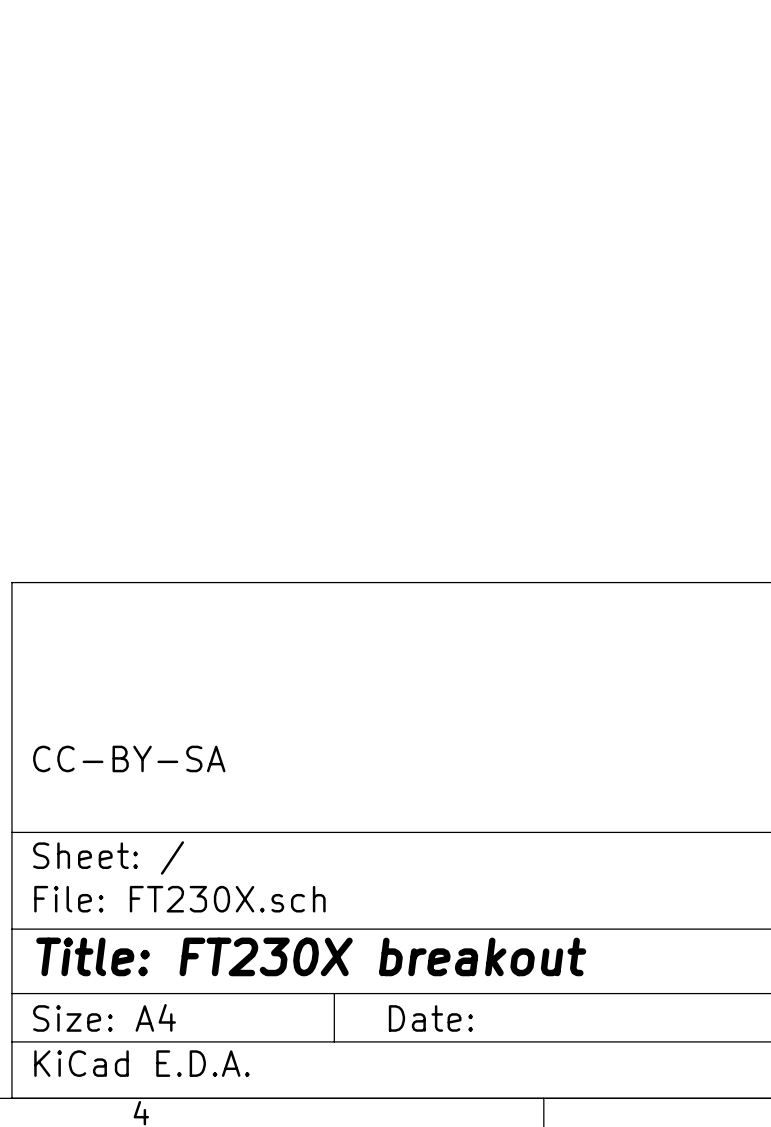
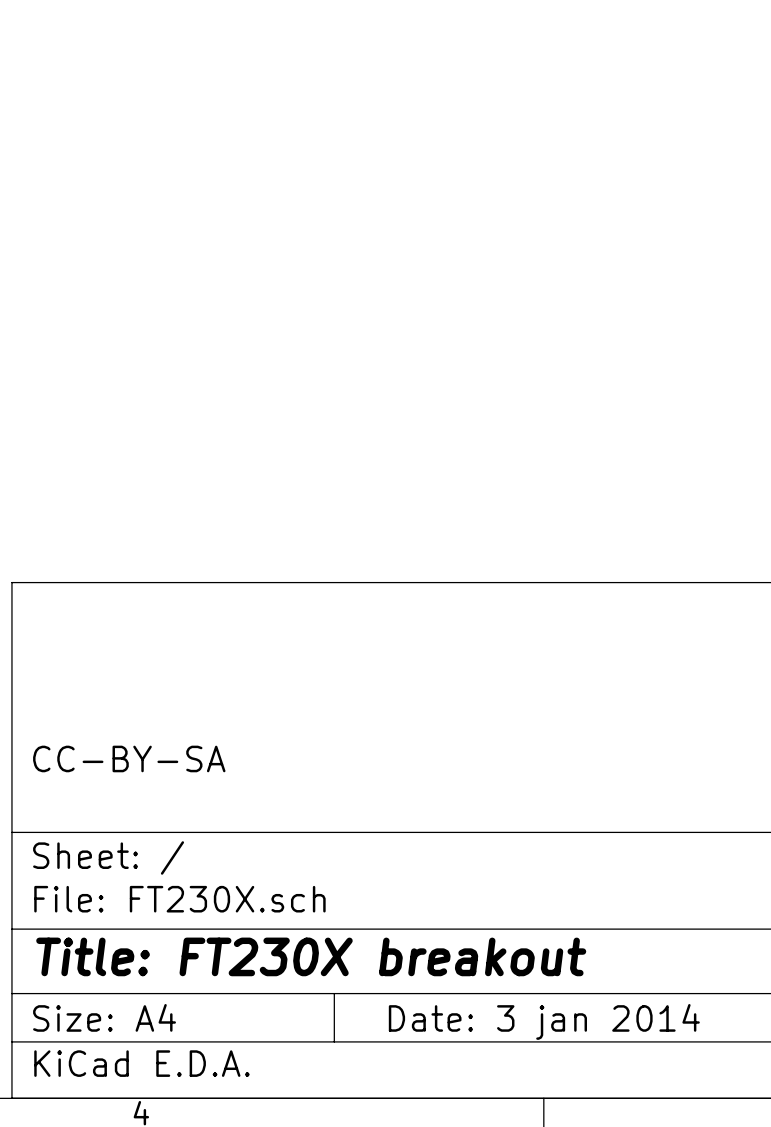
title block: Date: (430, 1018) -> Date: 3 jan 2014 (544, 1021)

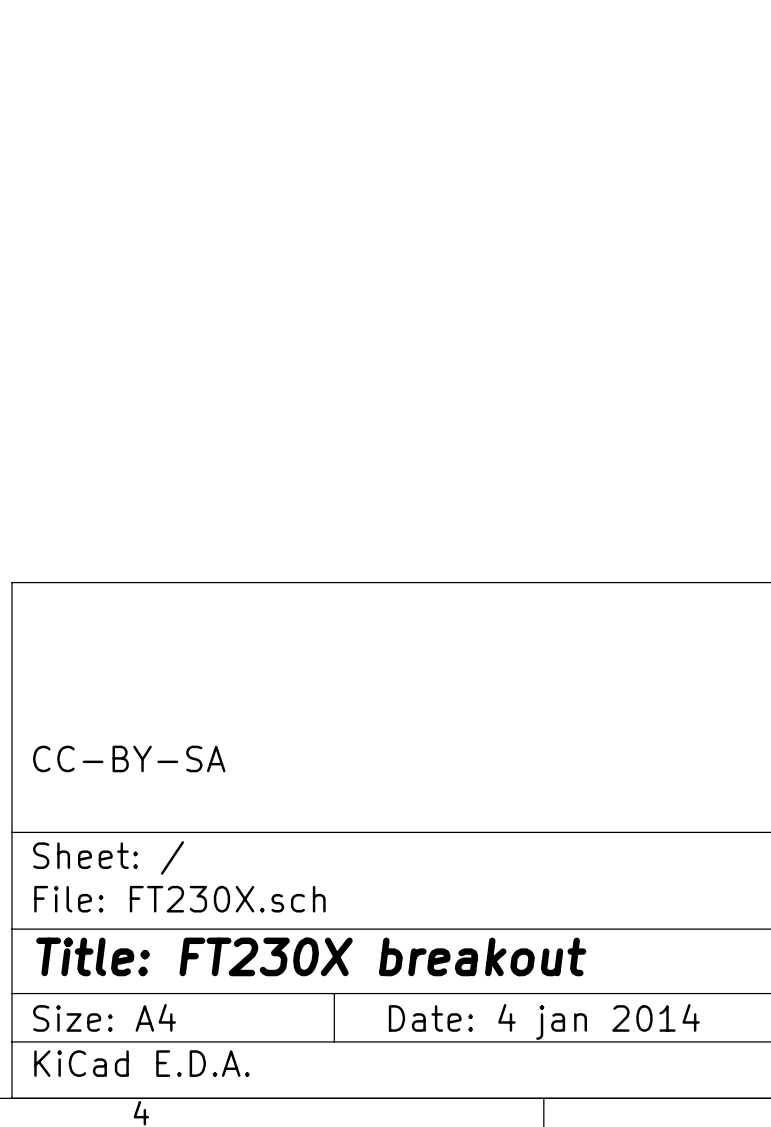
title block: Date: 3 jan 2014 (544, 1021) -> Date: 4 jan 2014 (544, 1021)

